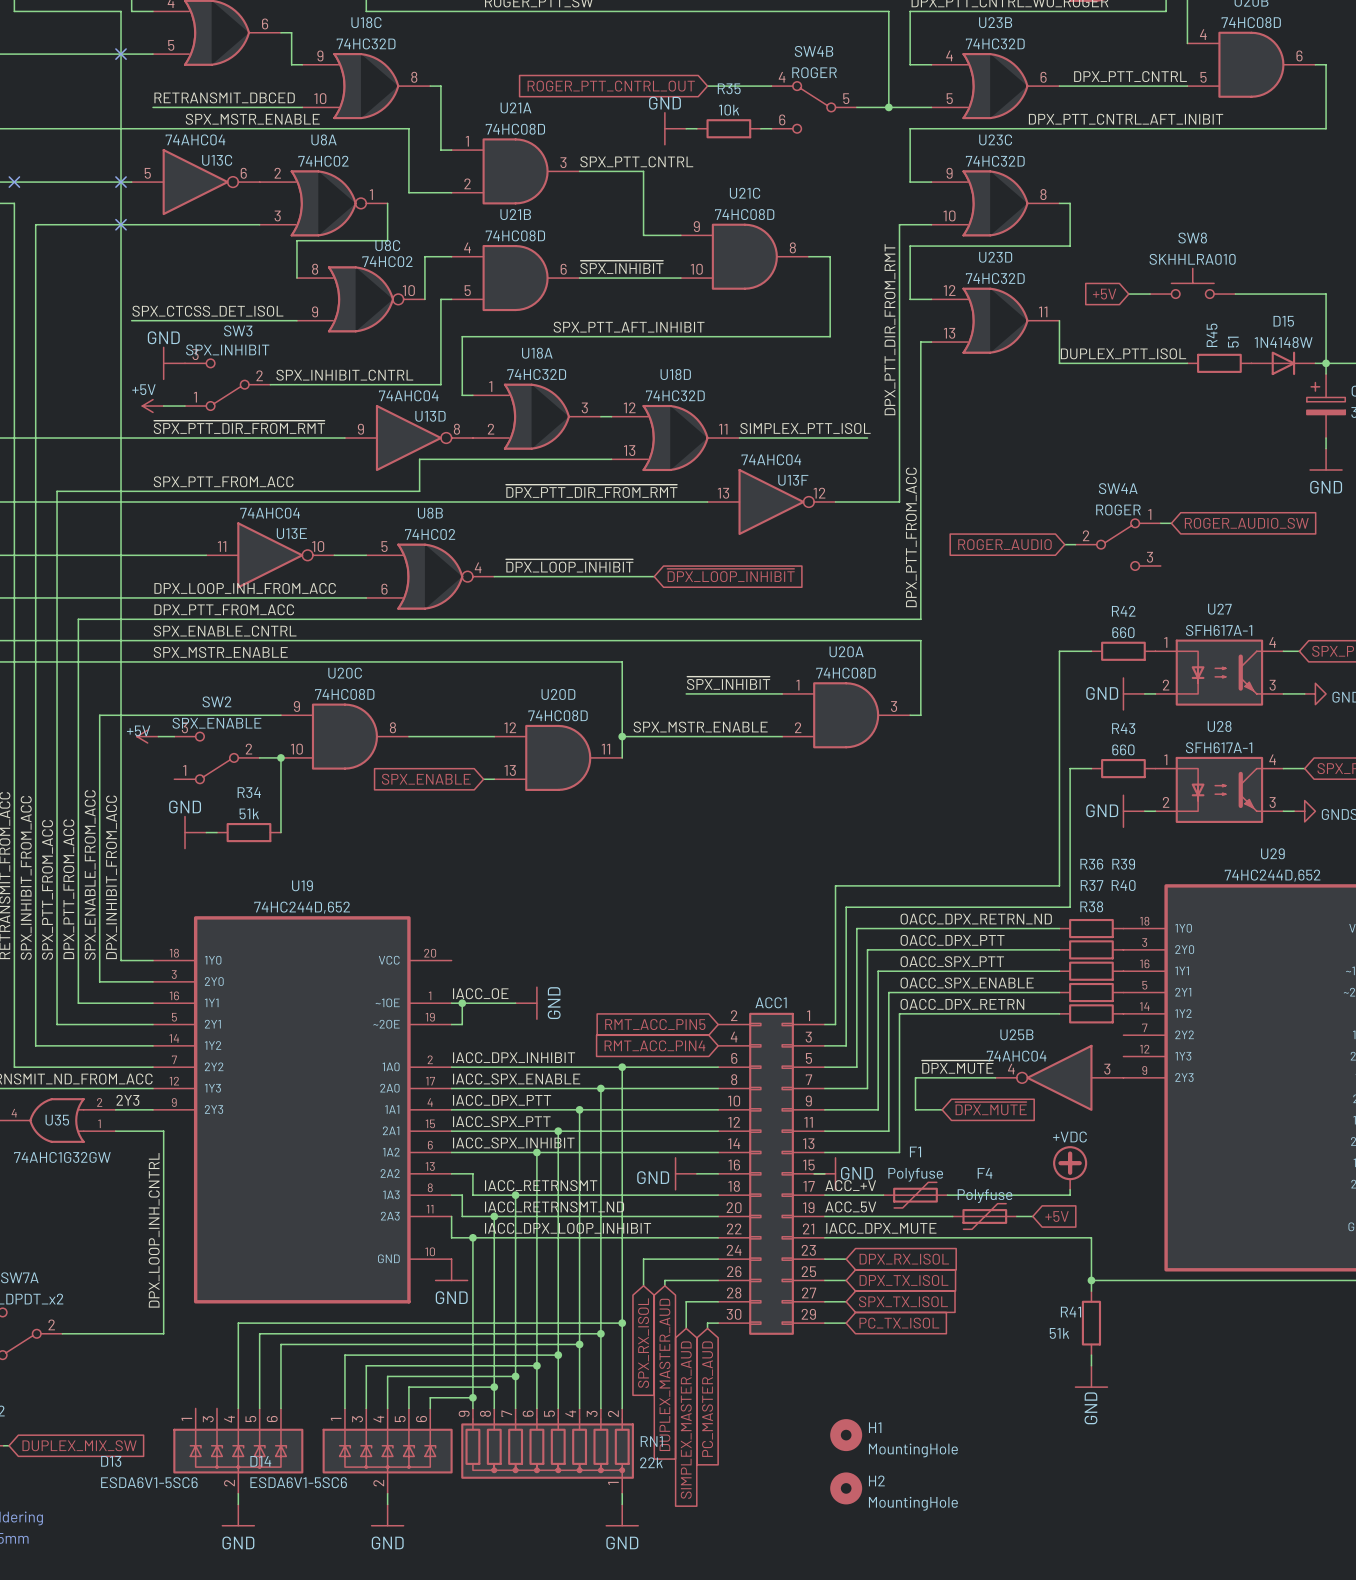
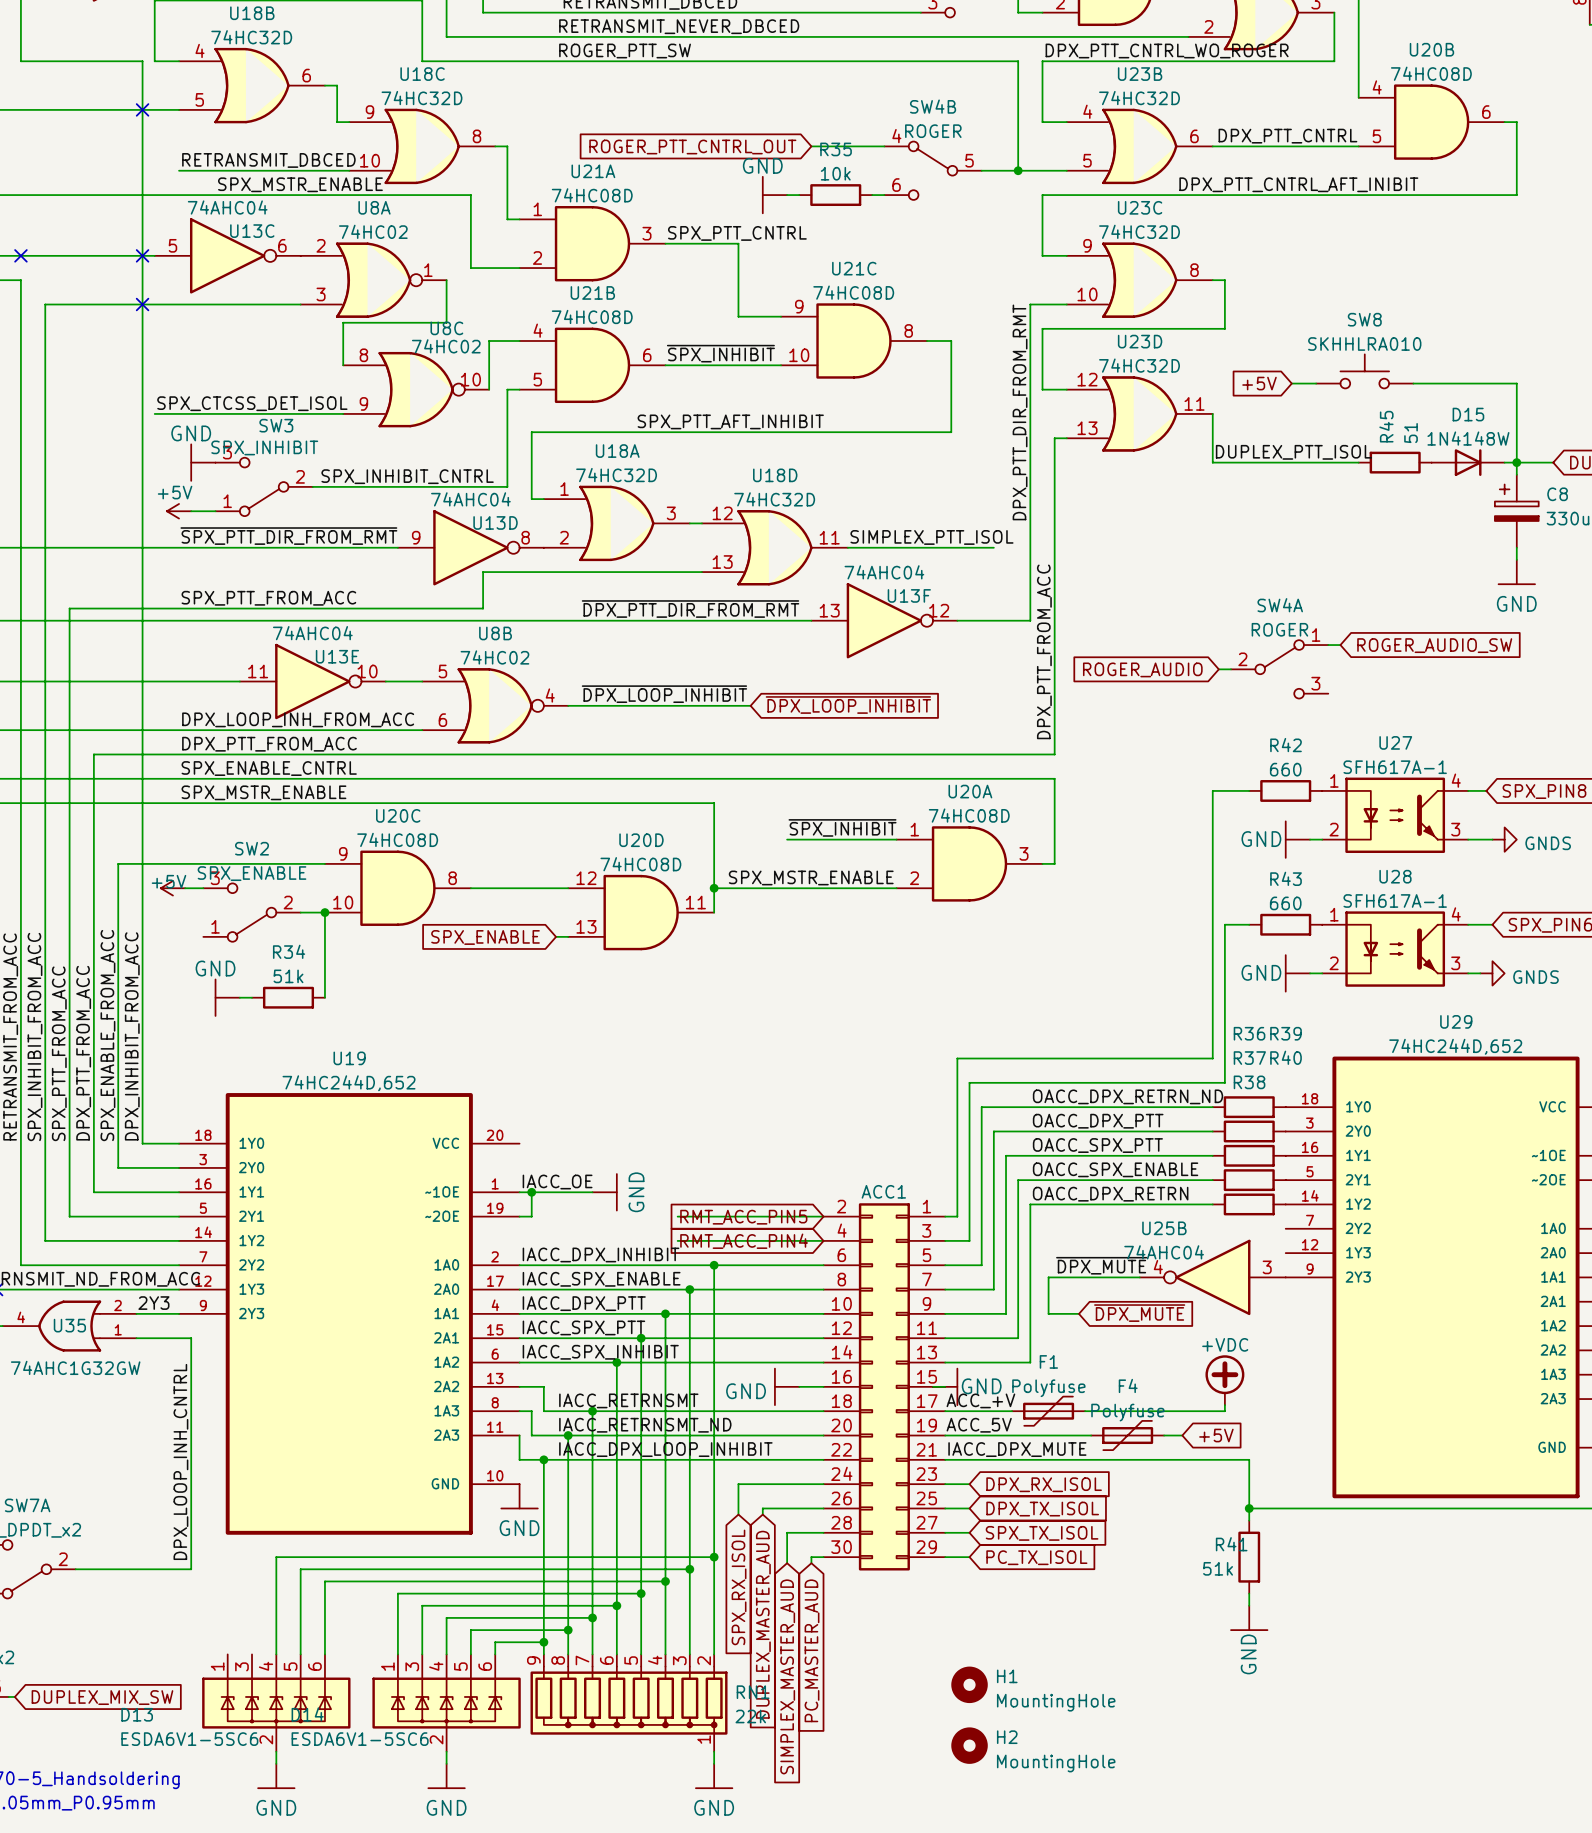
wire: none -> (677, 1216) (823, 1216)
wire: none -> (677, 1240) (823, 1240)

